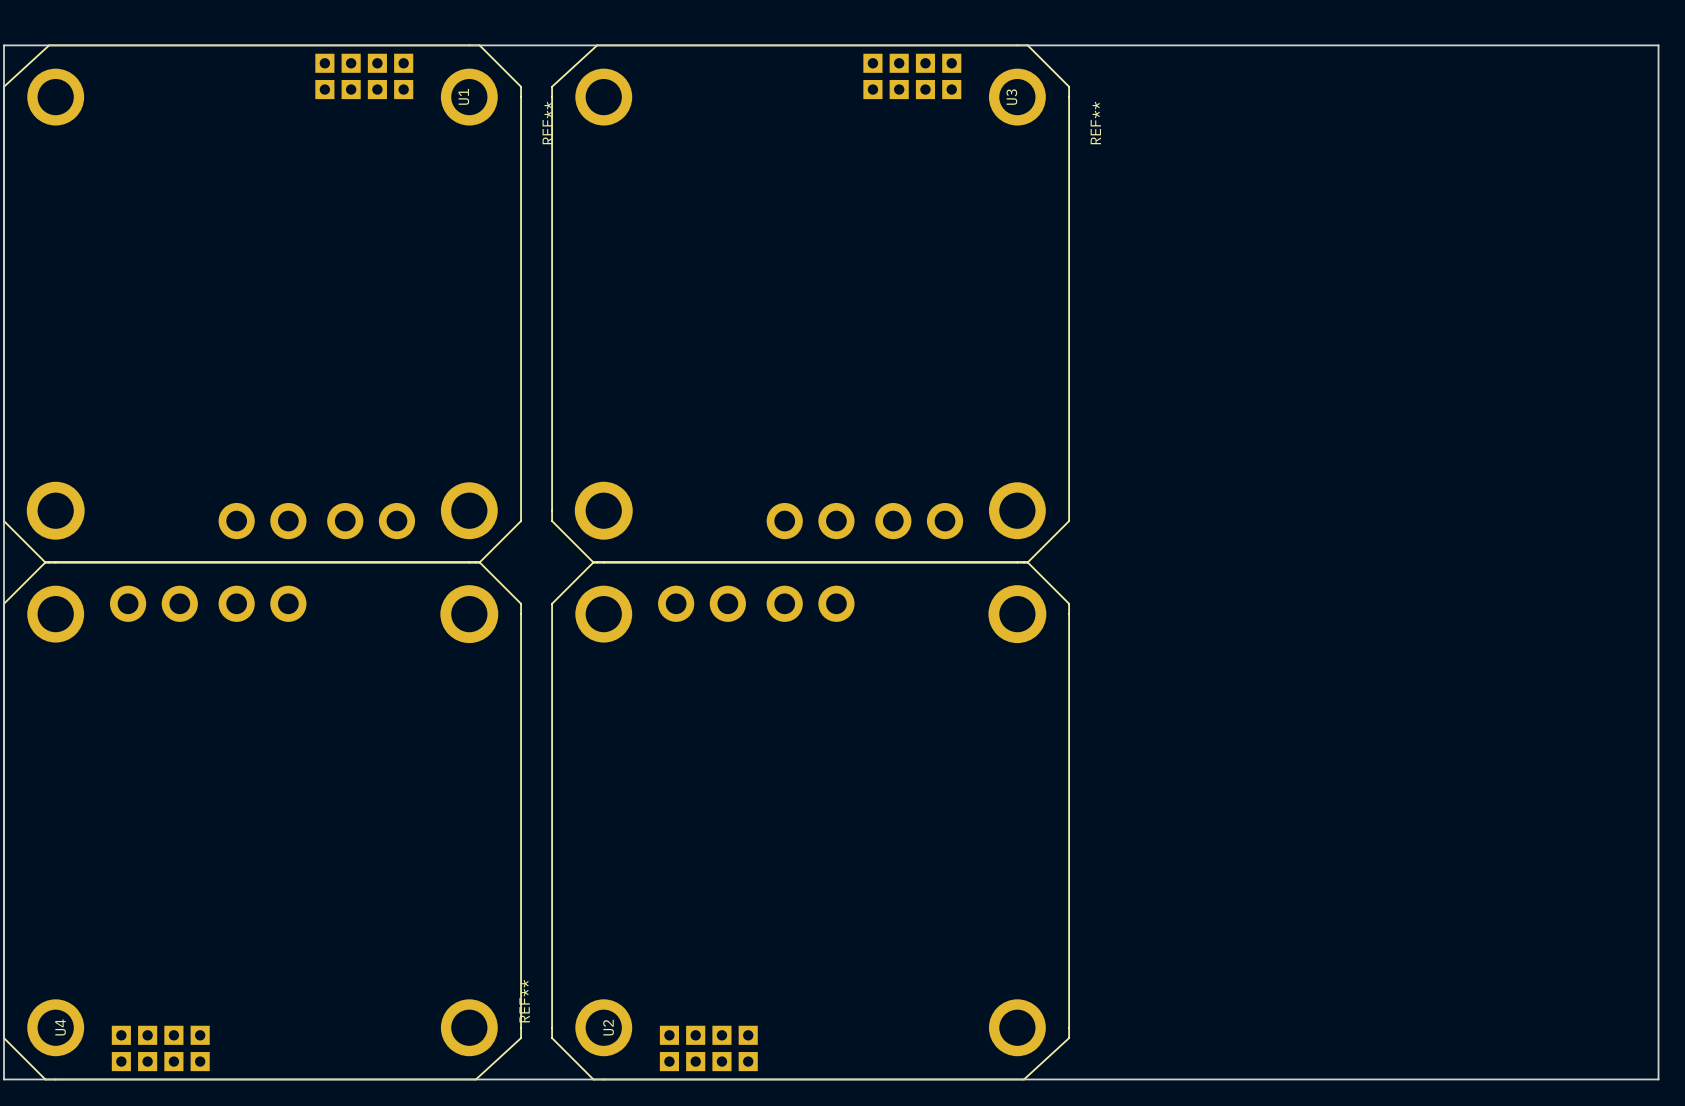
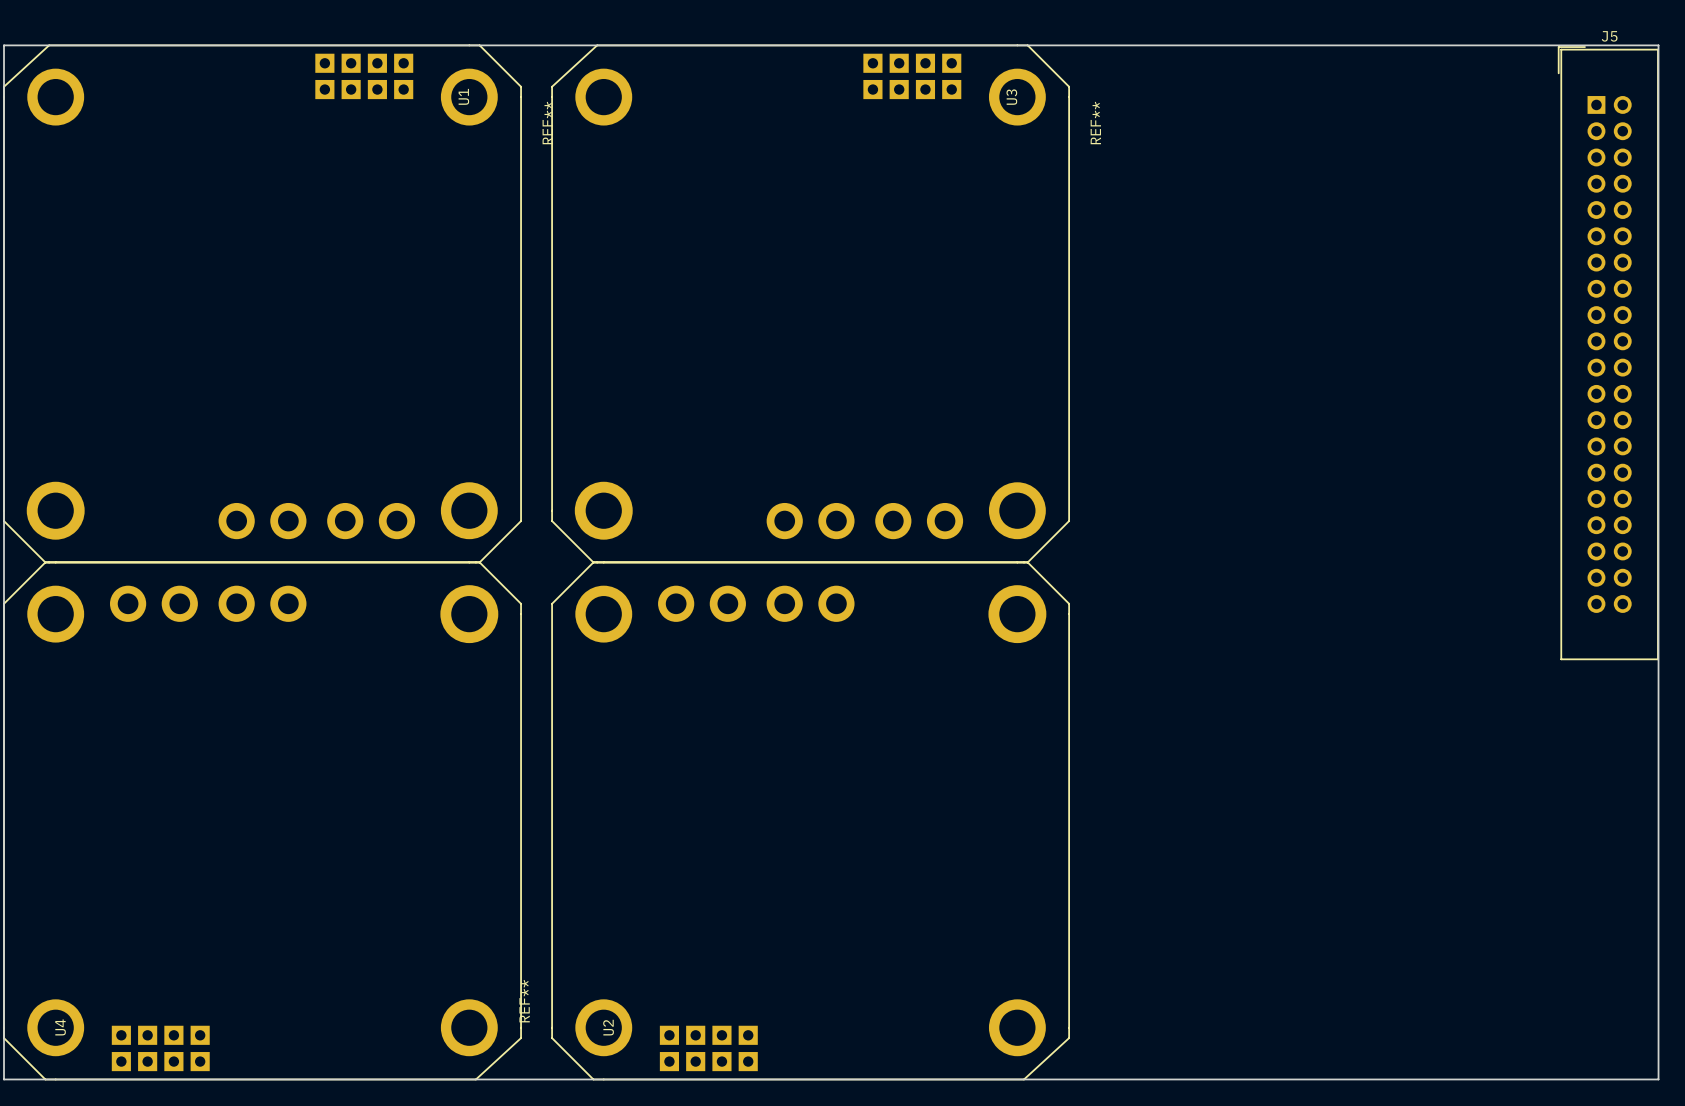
J5: none -> (1608, 353)

